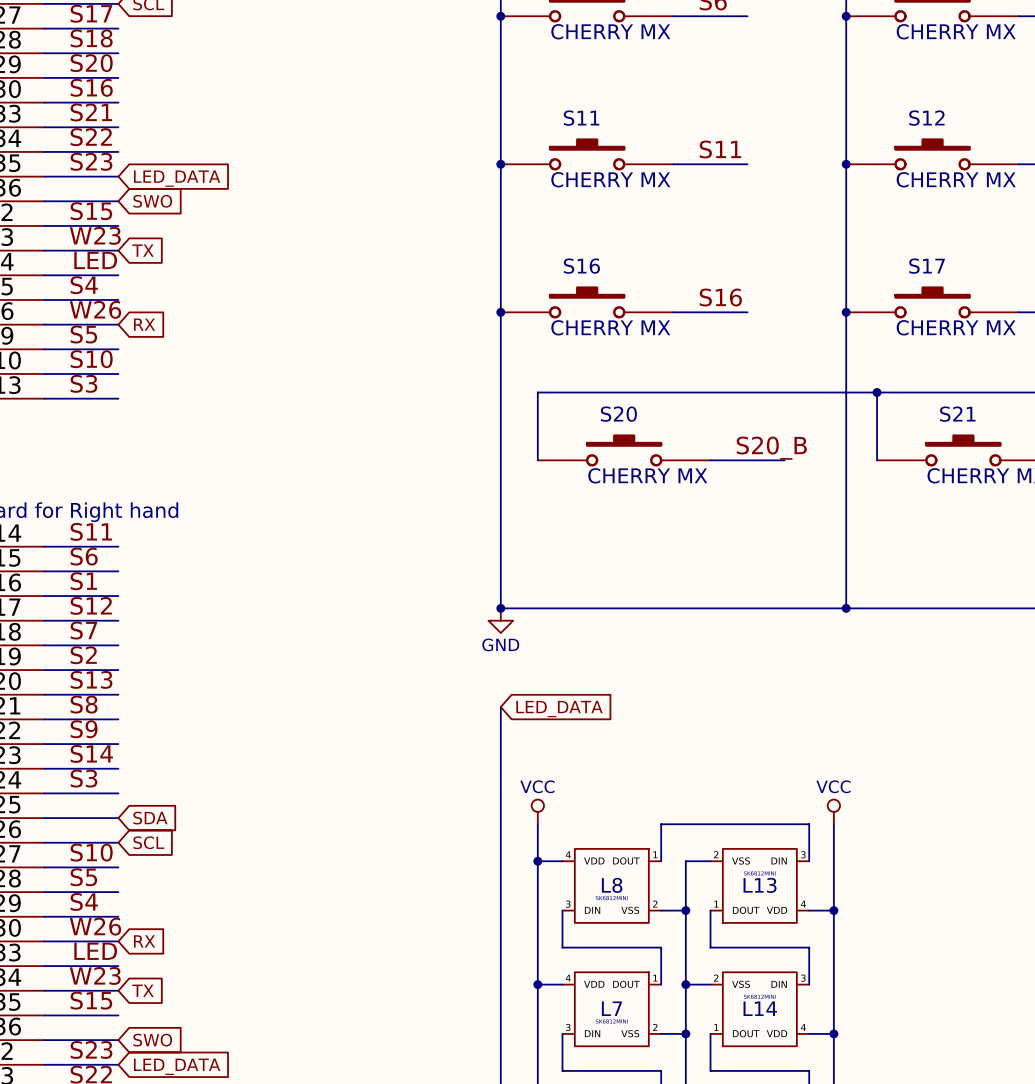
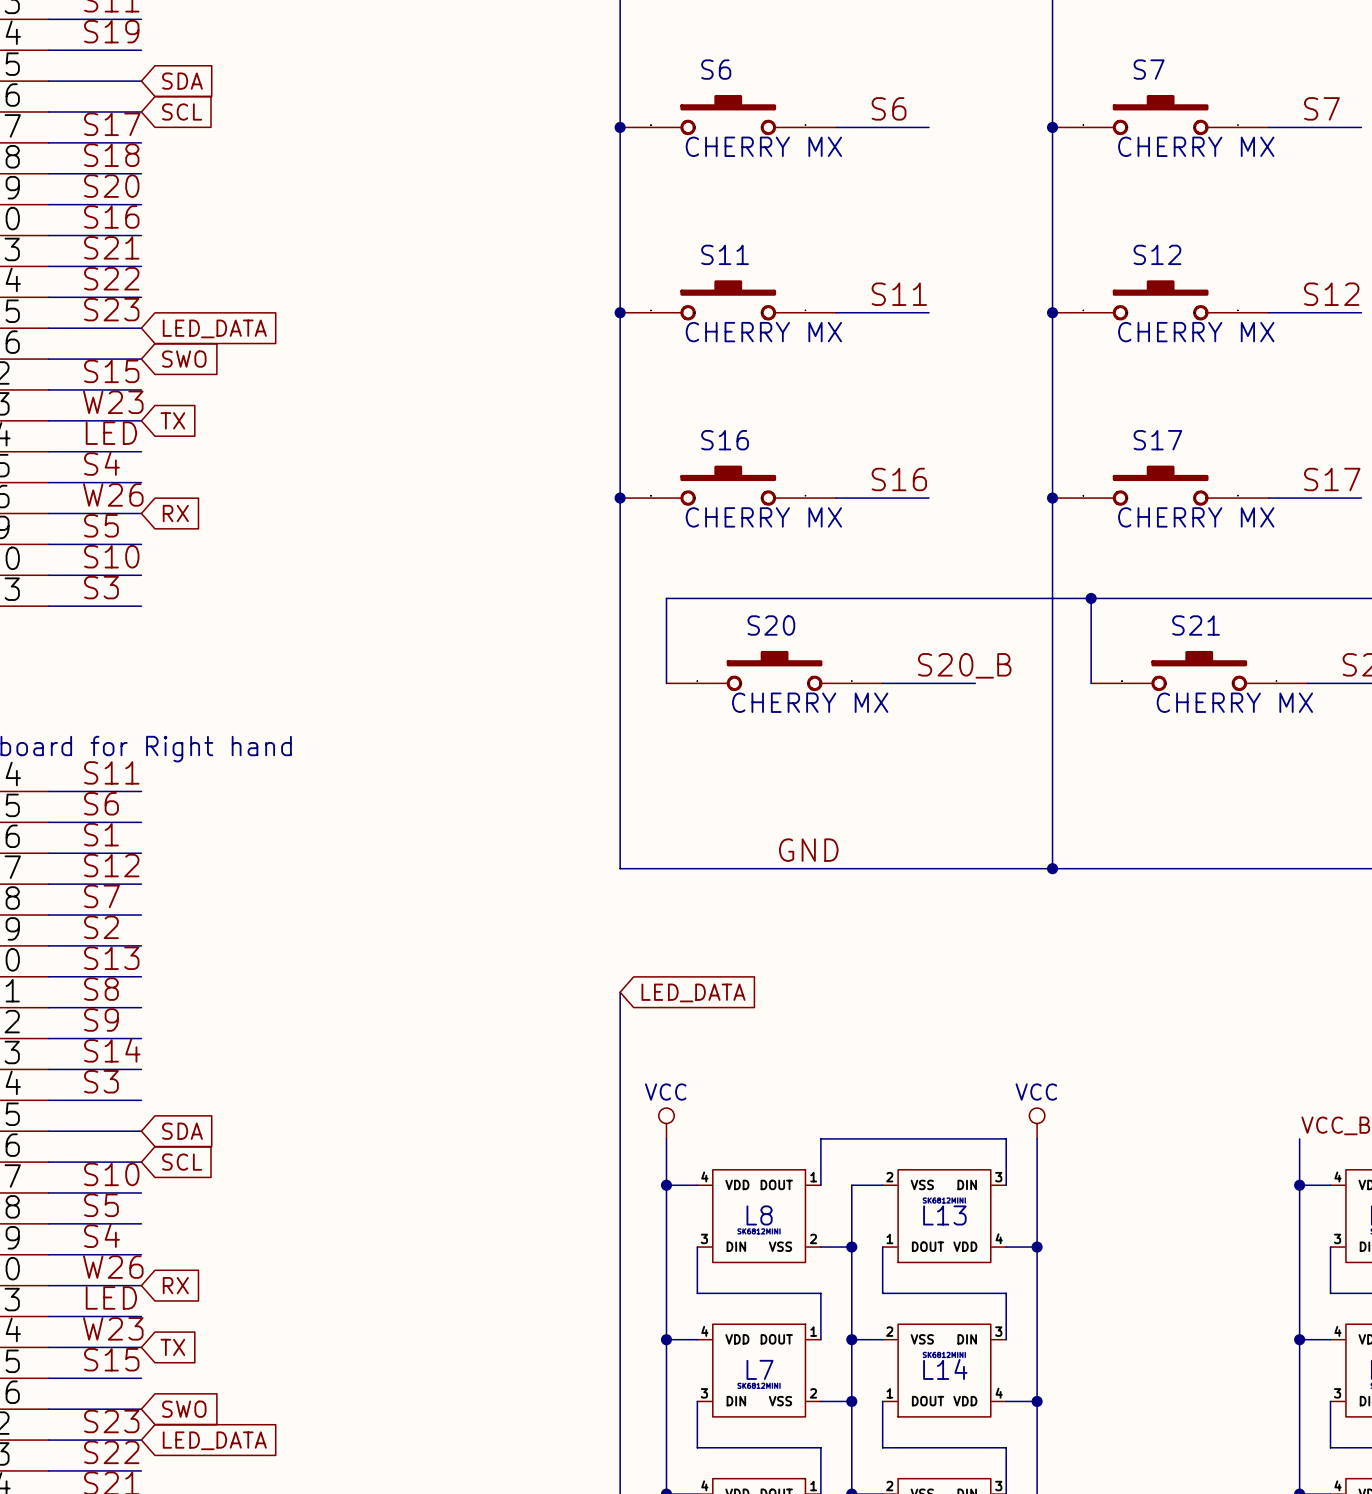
label: none -> GND (808, 850)
junction: (500, 608) -> none
power symbol: GND (500, 620) -> none

